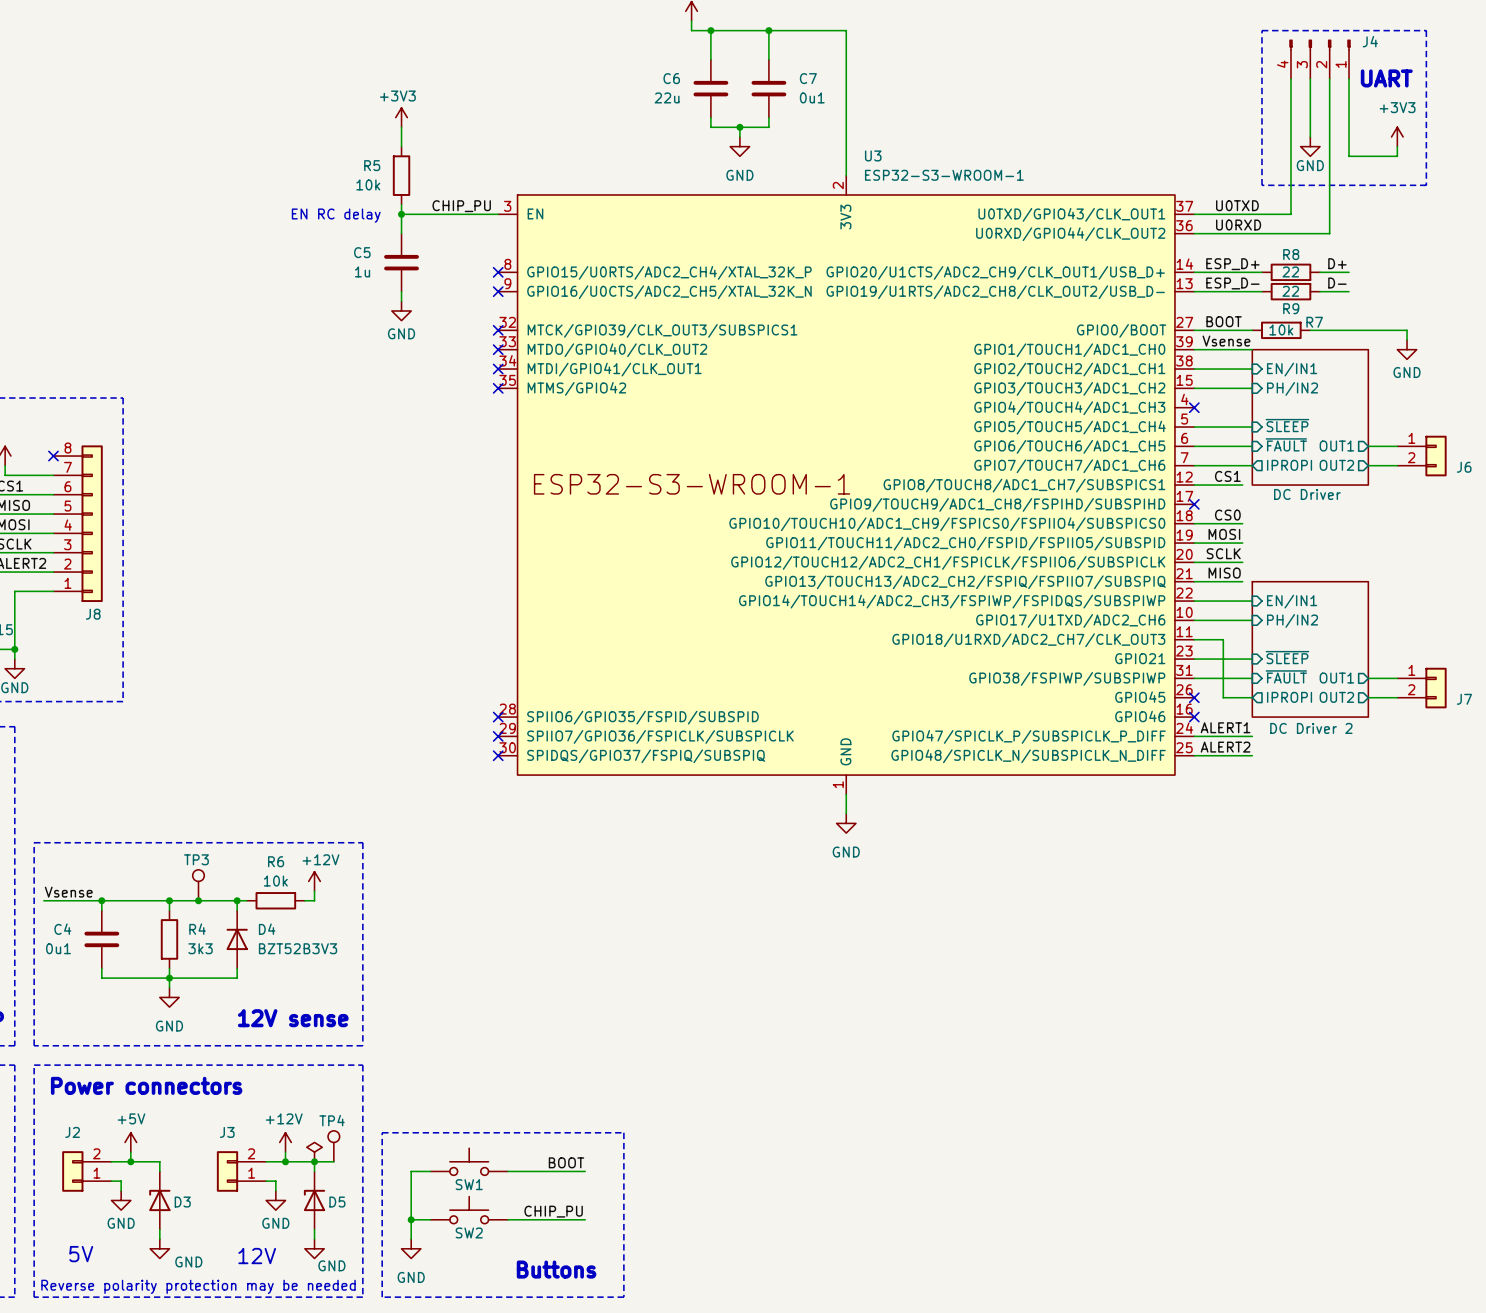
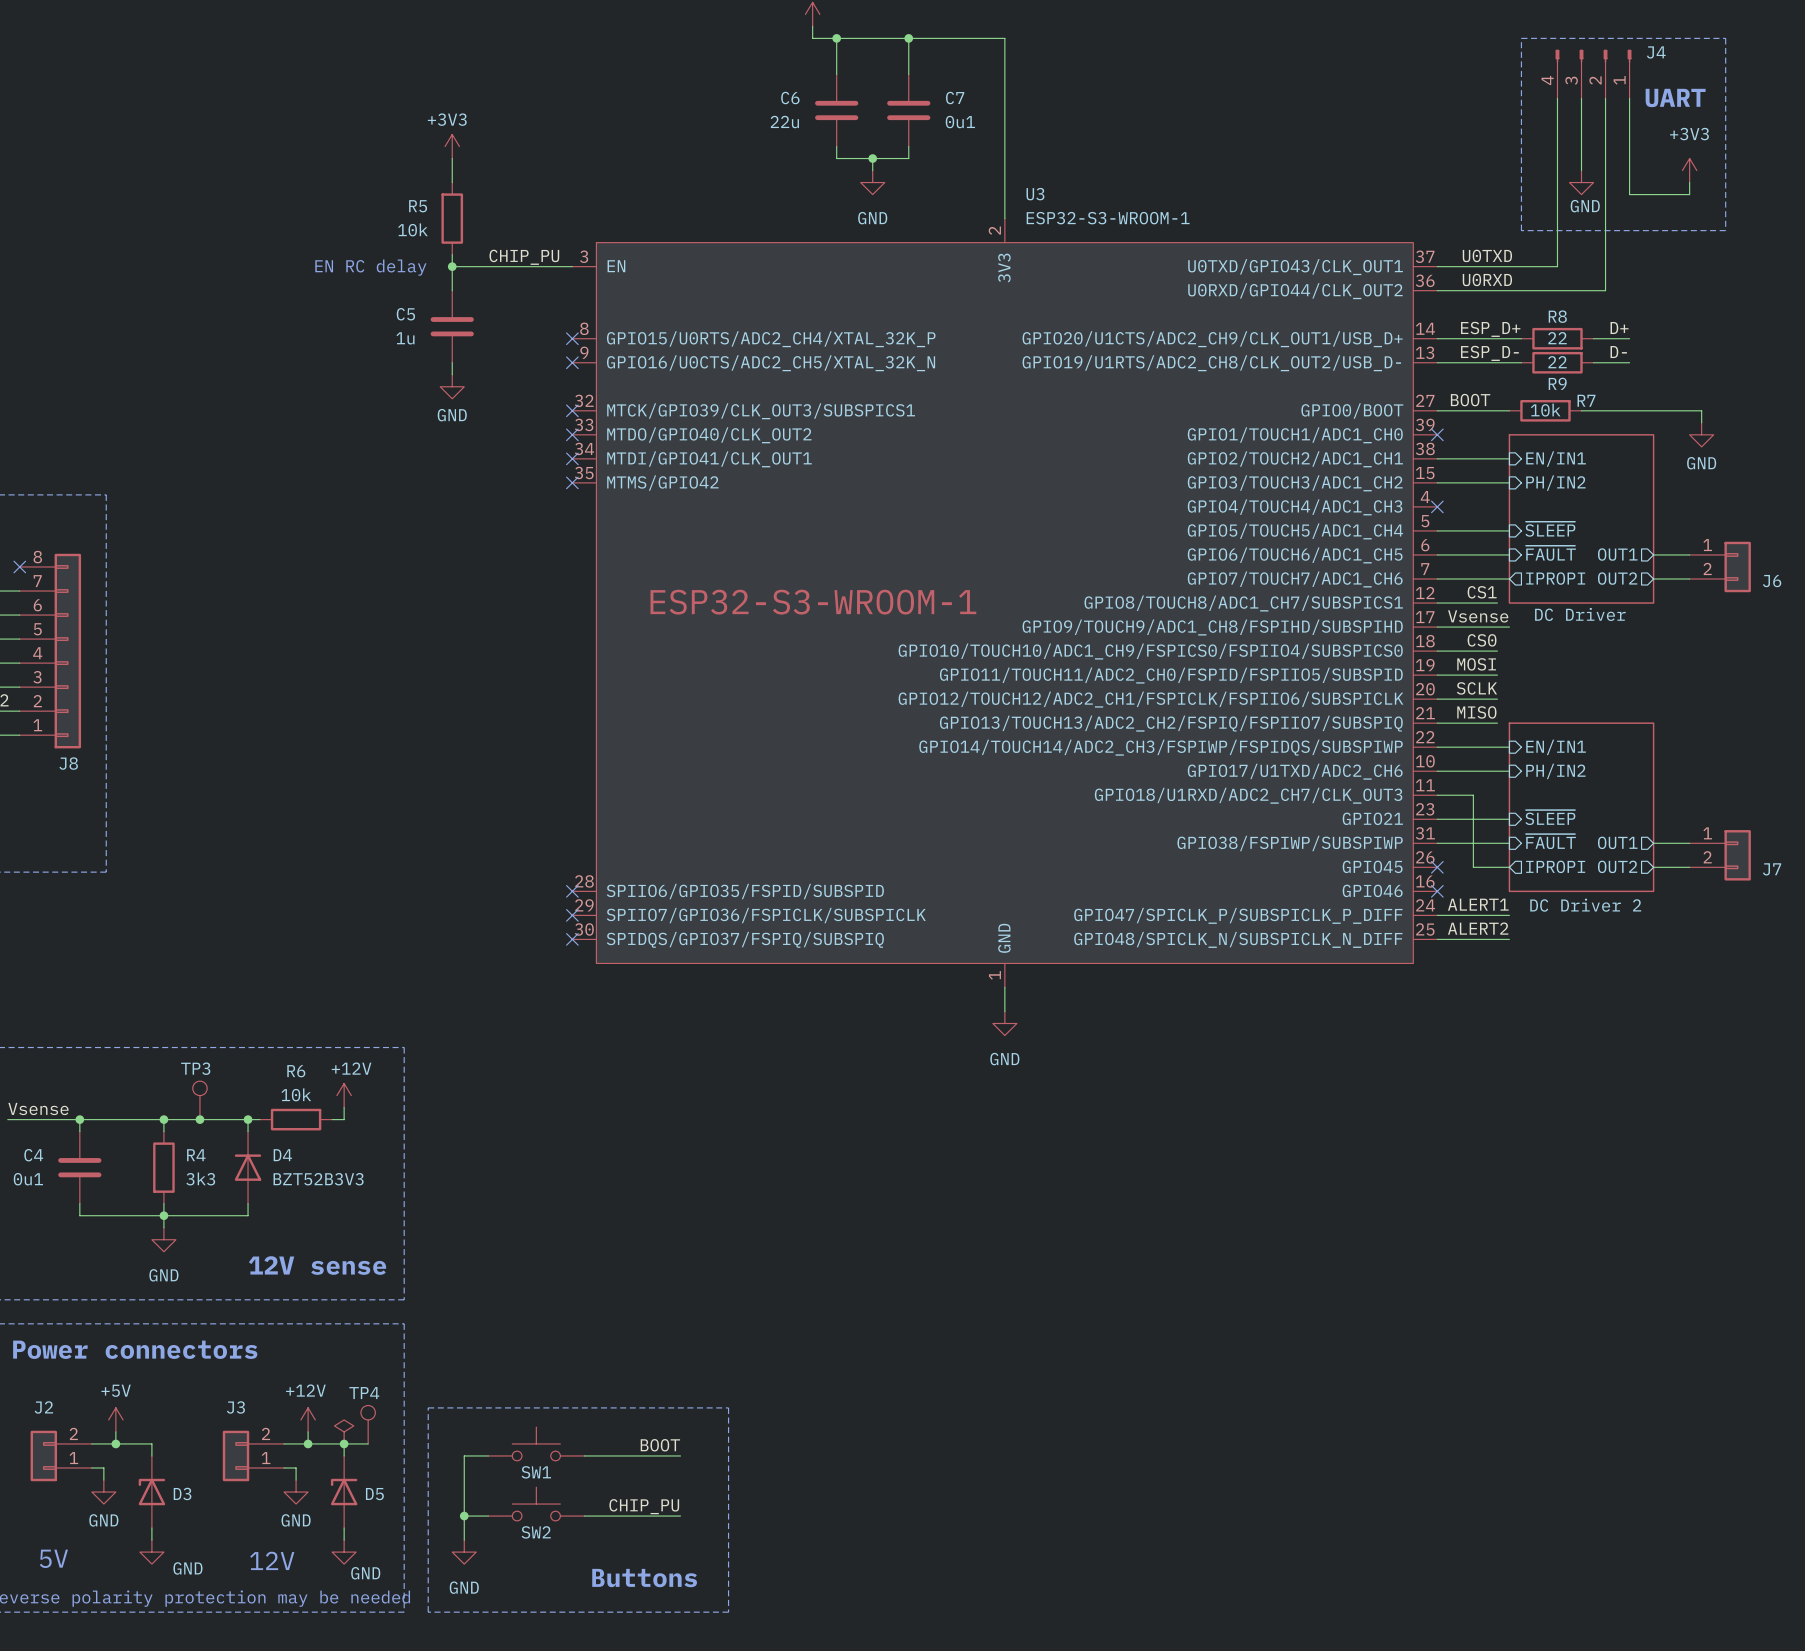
label position: Vsense (1226, 341) -> Vsense (1478, 616)
wire: (1194, 349) (1252, 349) -> (1437, 627) (1509, 627)
no-connect mark: none -> (1437, 434)
no-connect mark: (1194, 504) -> none

